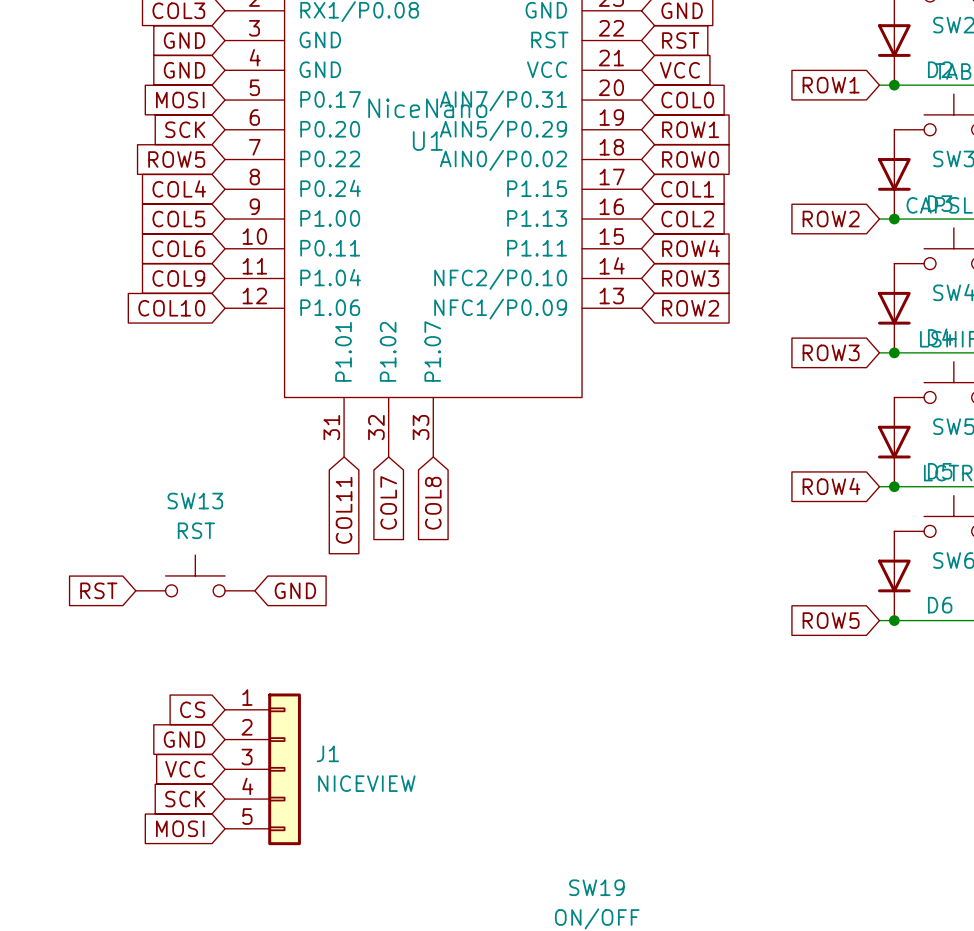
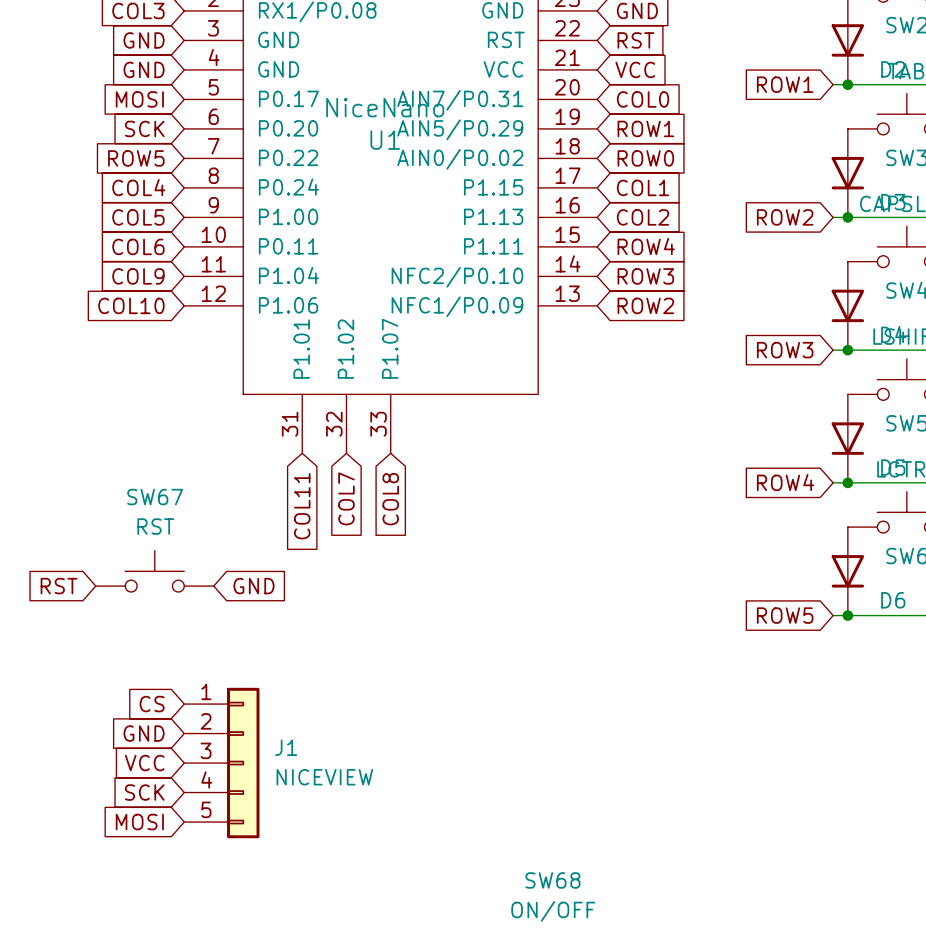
SW13 name: SW13 (195, 501) -> SW67 (155, 497)
SW19 name: SW19 (596, 887) -> SW68 (552, 880)

